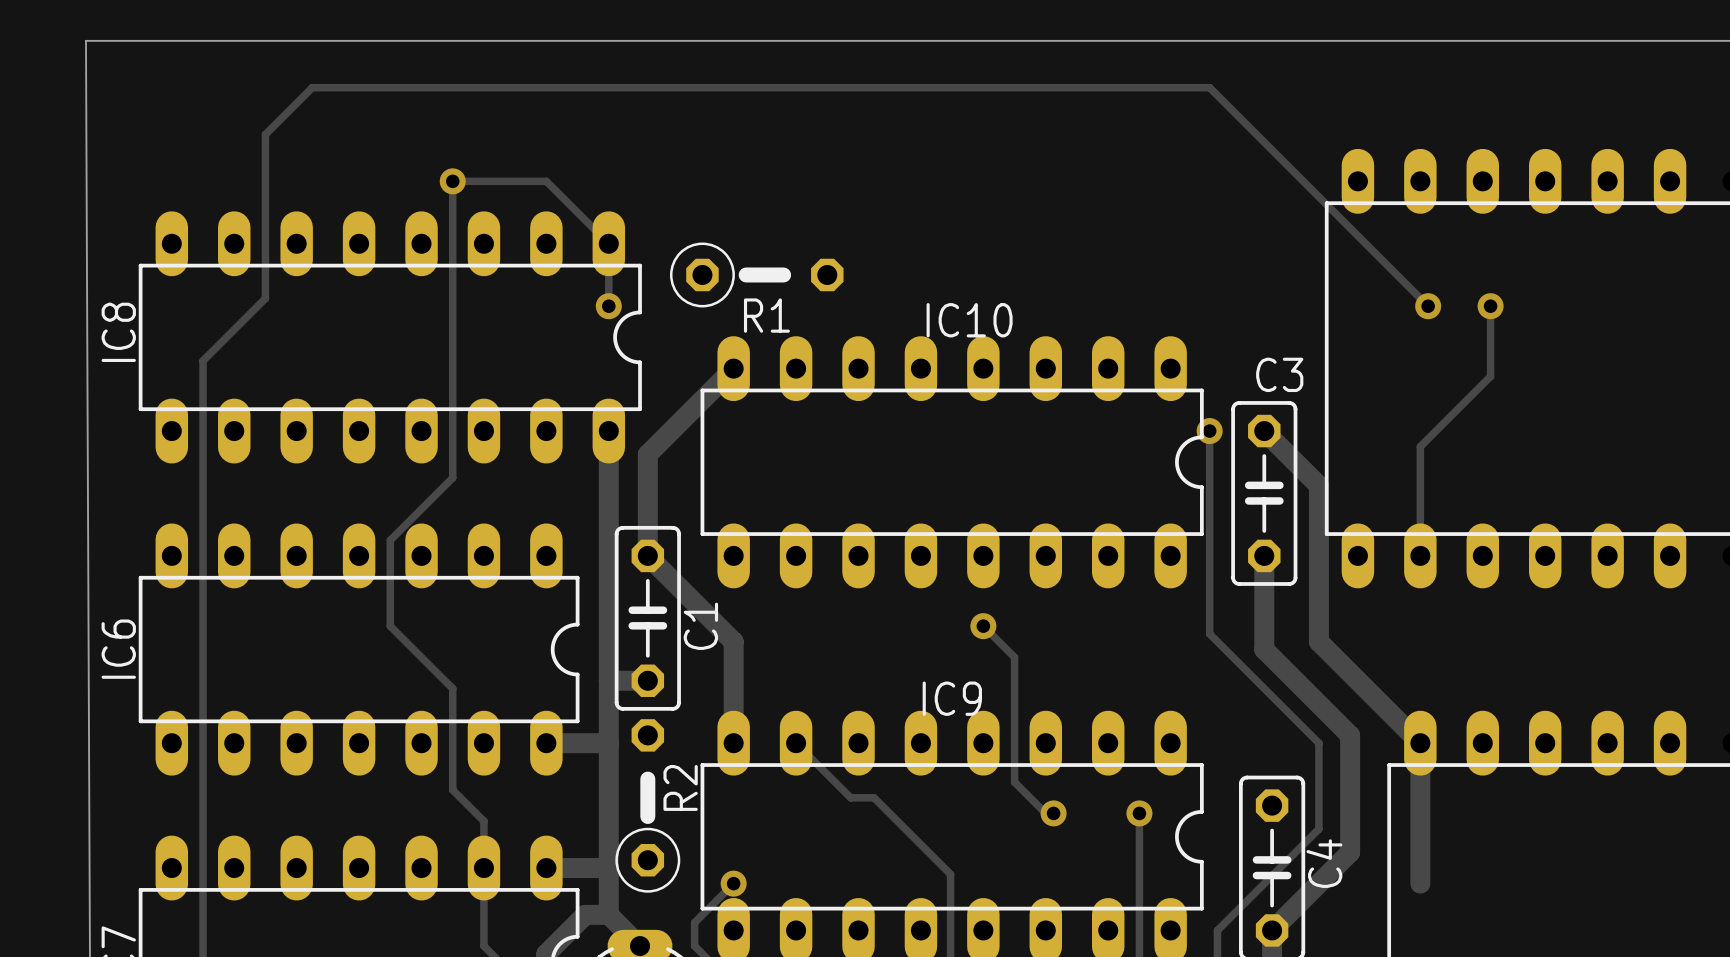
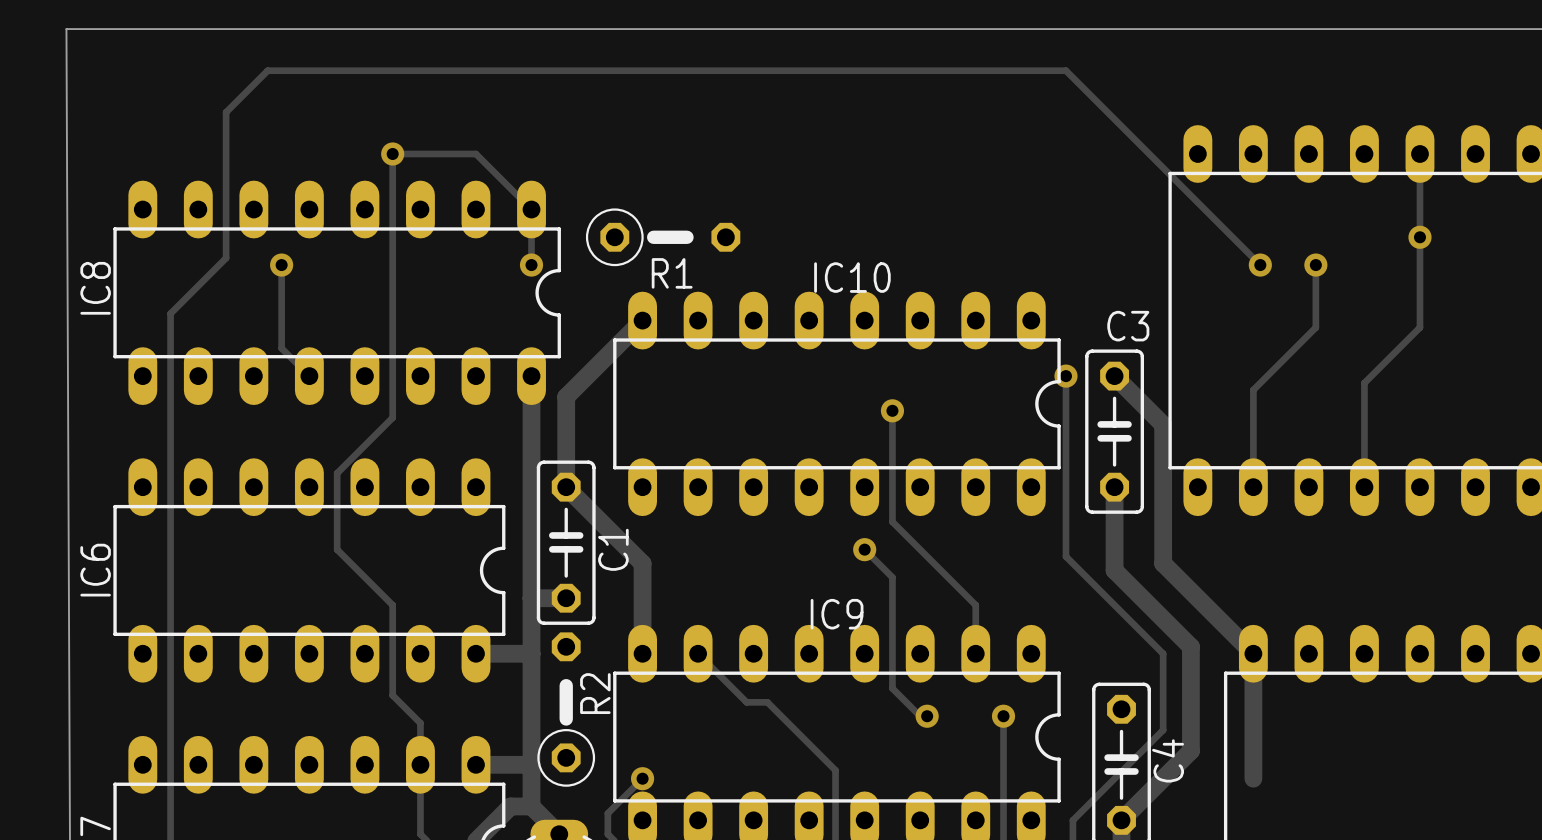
track: none -> (1419, 153) (1419, 327) (1364, 383) (1364, 487)
via: none -> (1419, 237)
track: none -> (281, 265) (281, 348) (309, 376)
via: none -> (281, 265)
track: none -> (892, 410) (892, 521) (975, 605) (975, 653)
via: none -> (892, 410)

